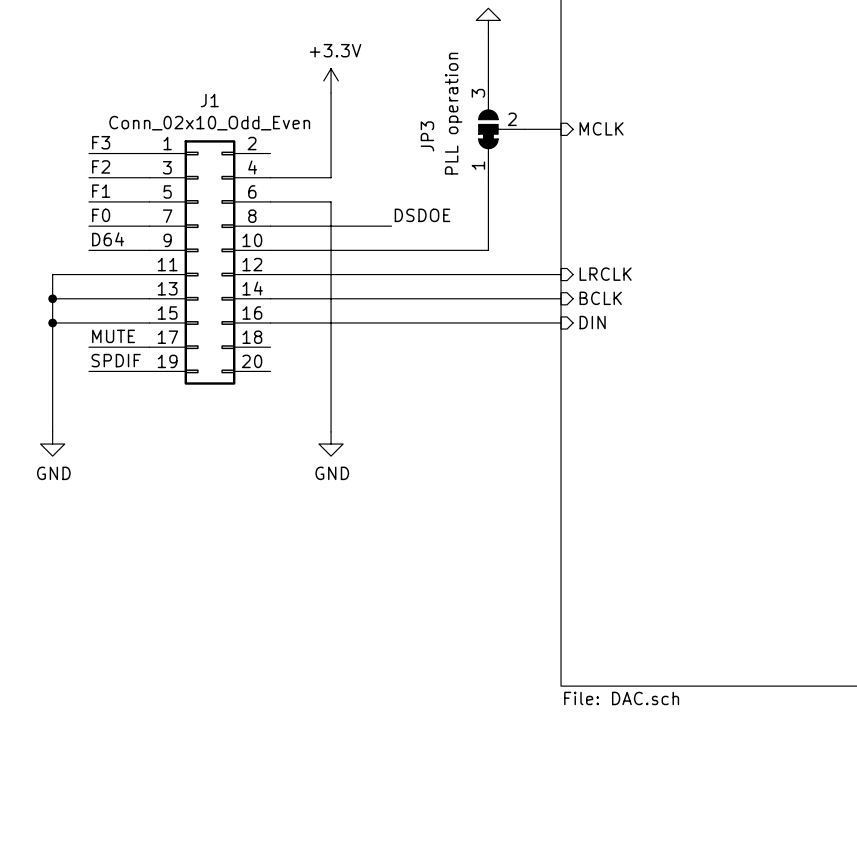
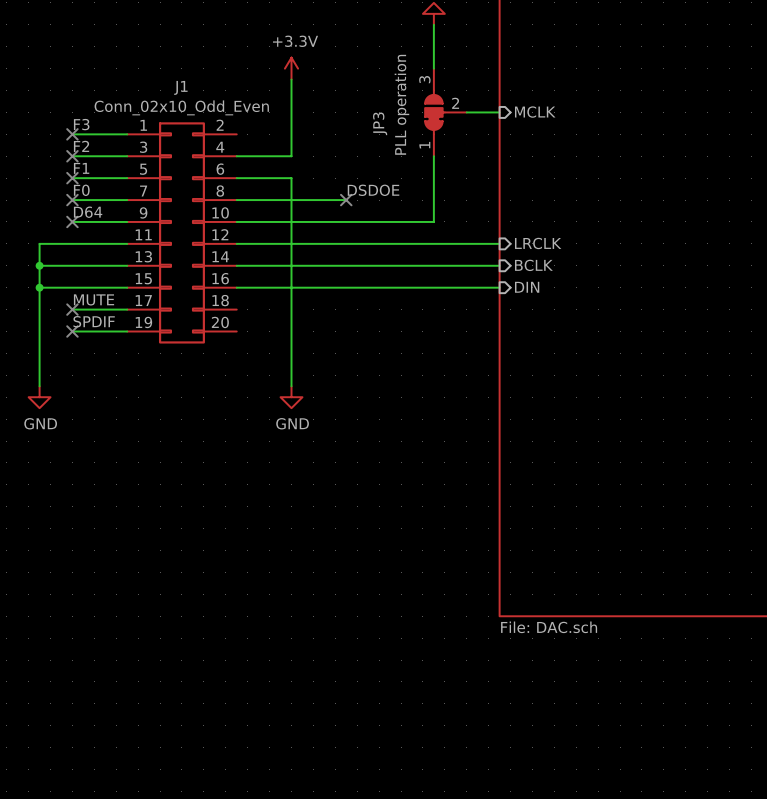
no-connect mark: none -> (72, 134)
no-connect mark: none -> (72, 156)
no-connect mark: none -> (72, 178)
no-connect mark: none -> (72, 200)
no-connect mark: none -> (346, 200)
no-connect mark: none -> (72, 221)
no-connect mark: none -> (72, 309)
no-connect mark: none -> (72, 331)

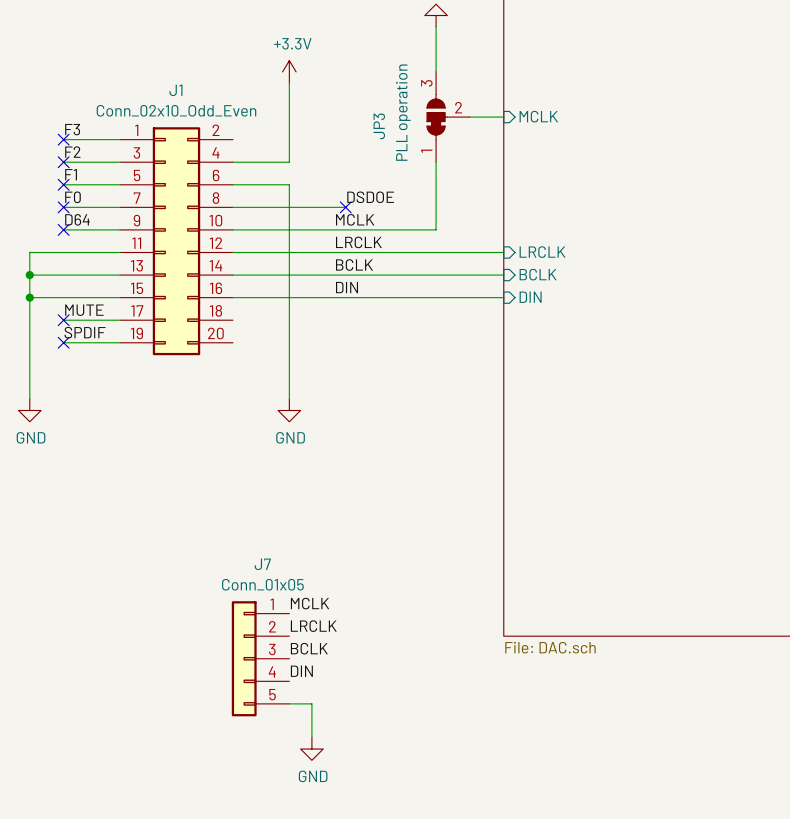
label: none -> MCLK (355, 219)
label: none -> LRCLK (358, 242)
label: none -> BCLK (354, 265)
label: none -> DIN (347, 287)
label: none -> MCLK (310, 603)
label: none -> LRCLK (313, 626)
label: none -> BCLK (309, 648)
J7: none -> Conn_01x05 (260, 658)
label: none -> DIN (301, 671)
wire: none -> (289, 703) (311, 703) (311, 737)
power symbol: none -> GND (311, 749)

